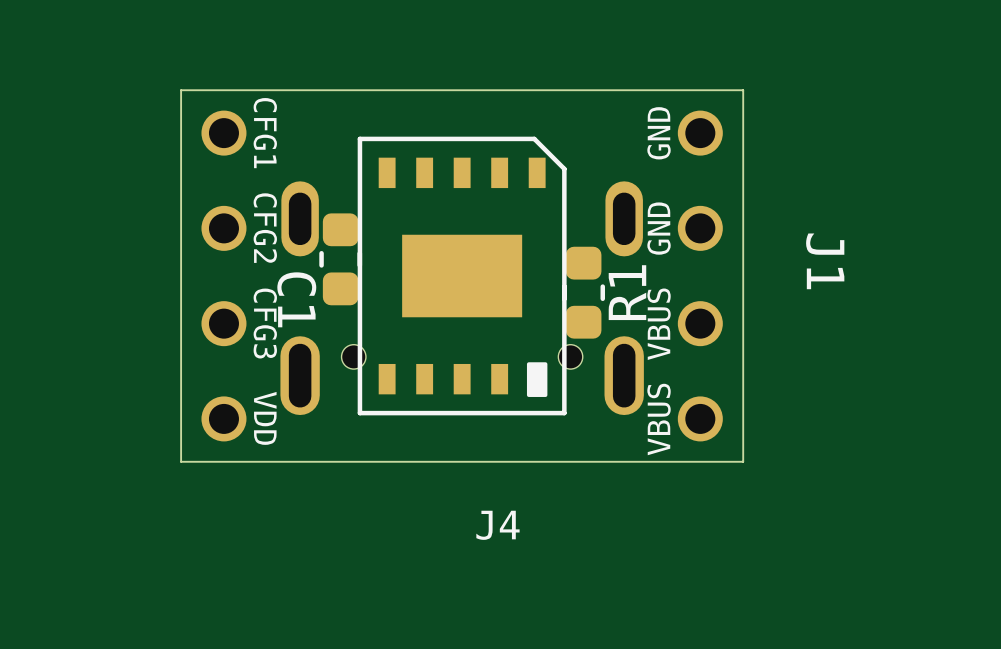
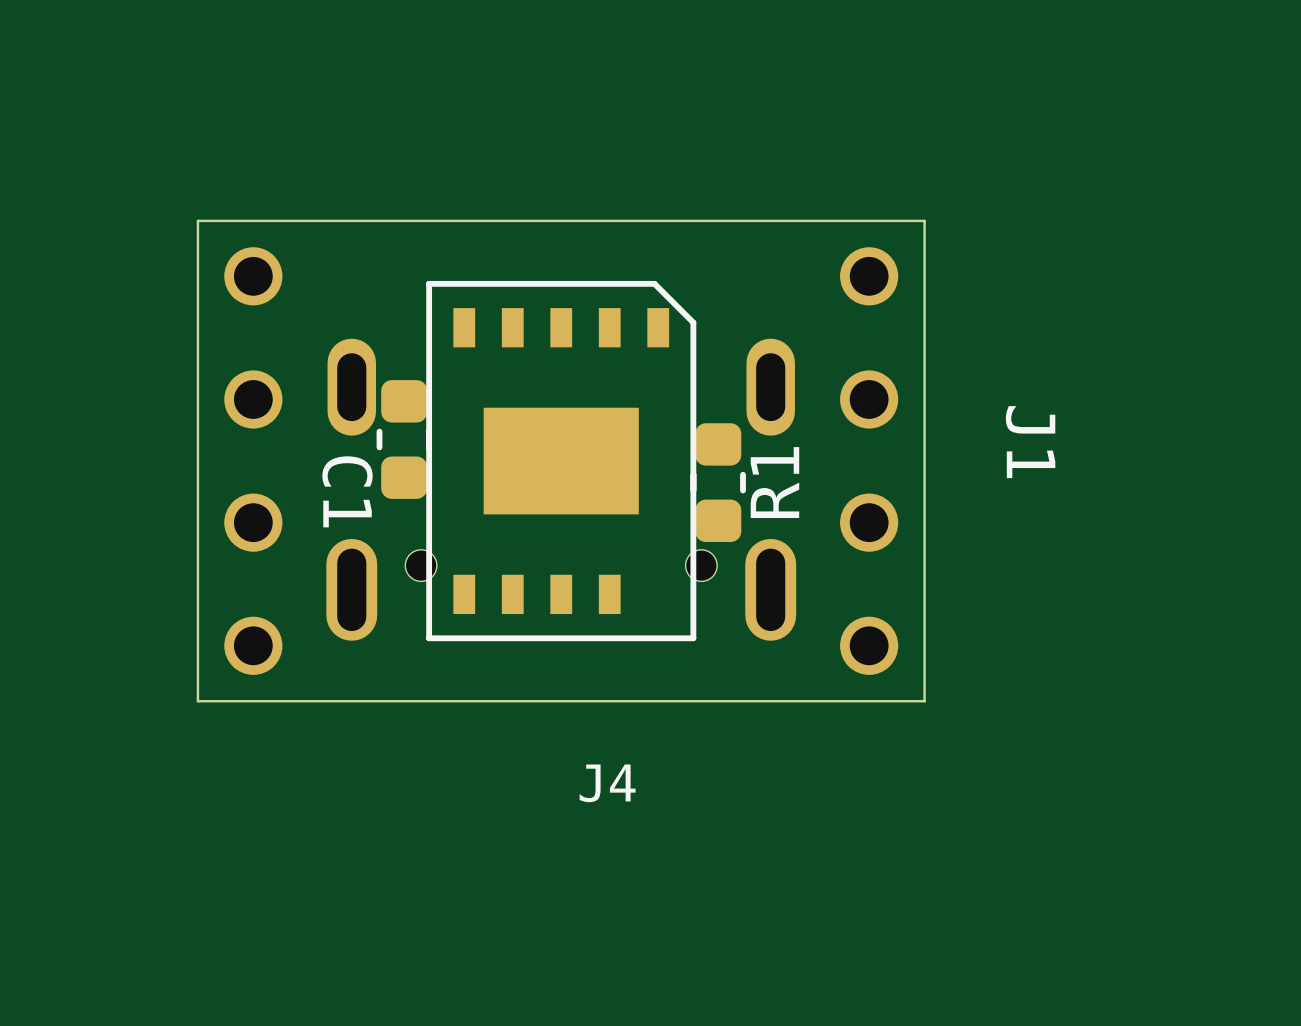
text: CFG1 (265, 133) -> none
text: GND (659, 133) -> none
text: CFG2 (265, 228) -> none
text: GND (659, 228) -> none
text: CFG3 (265, 323) -> none
text: VBUS (659, 324) -> none
drawing: [526, 362, 548, 397] -> none
text: VDD (265, 418) -> none
text: VBUS (659, 419) -> none

